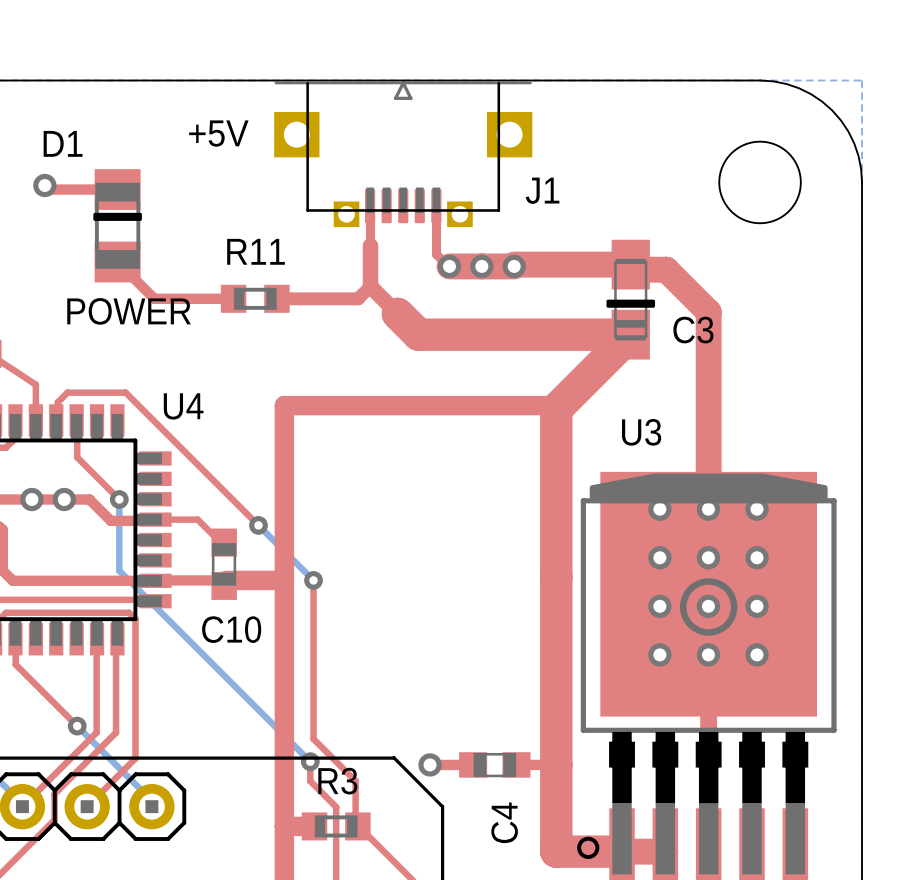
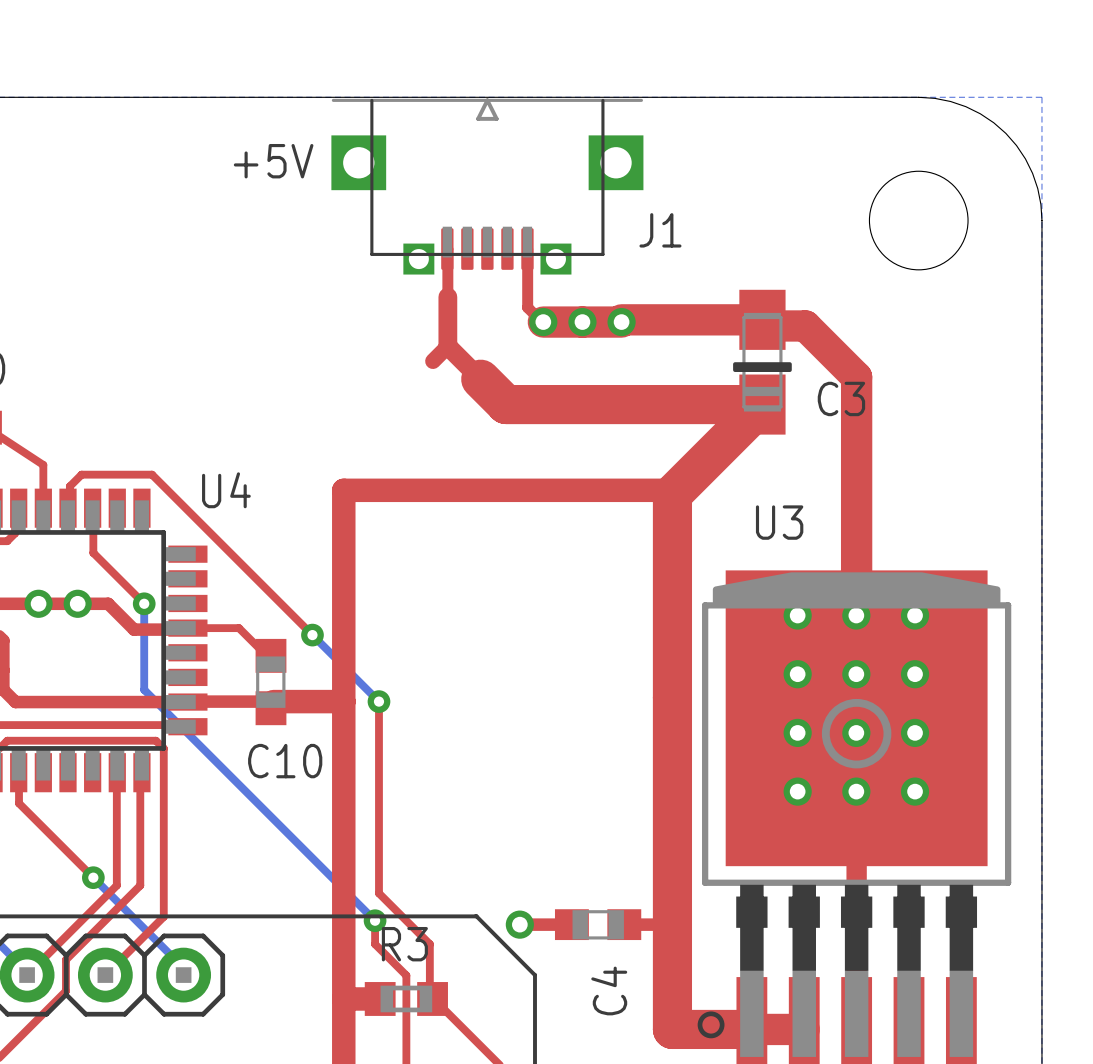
top track: (44, 185) (48, 189) (117, 189) -> none
via: (44, 185) -> none
D1: (117, 225) -> none
top track: (117, 262) (154, 298) (233, 298) -> none
R11: (255, 298) -> none
top track: (358, 298) (277, 299) -> none
text: POWER (129, 311) -> none

